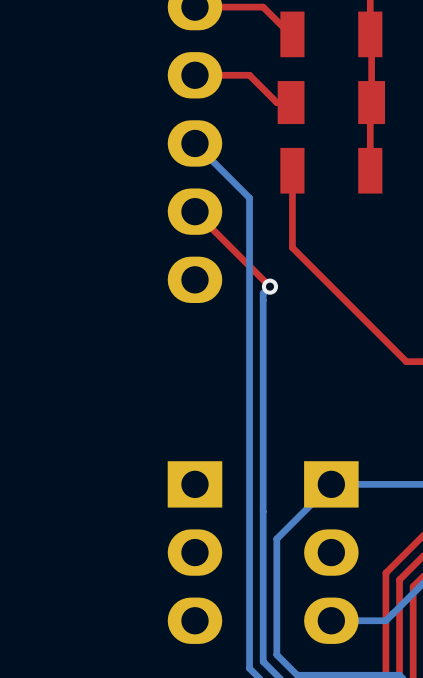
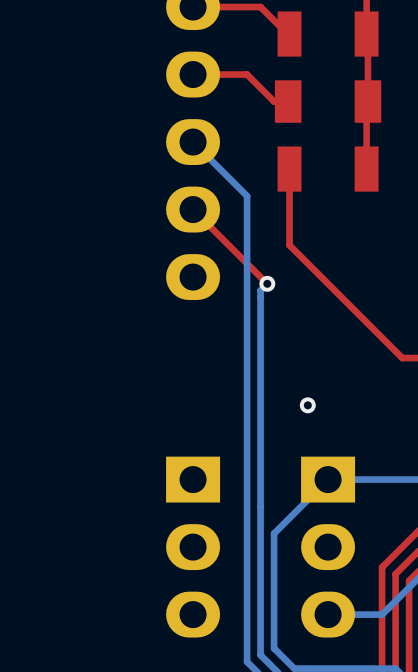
via: none -> (307, 405)

